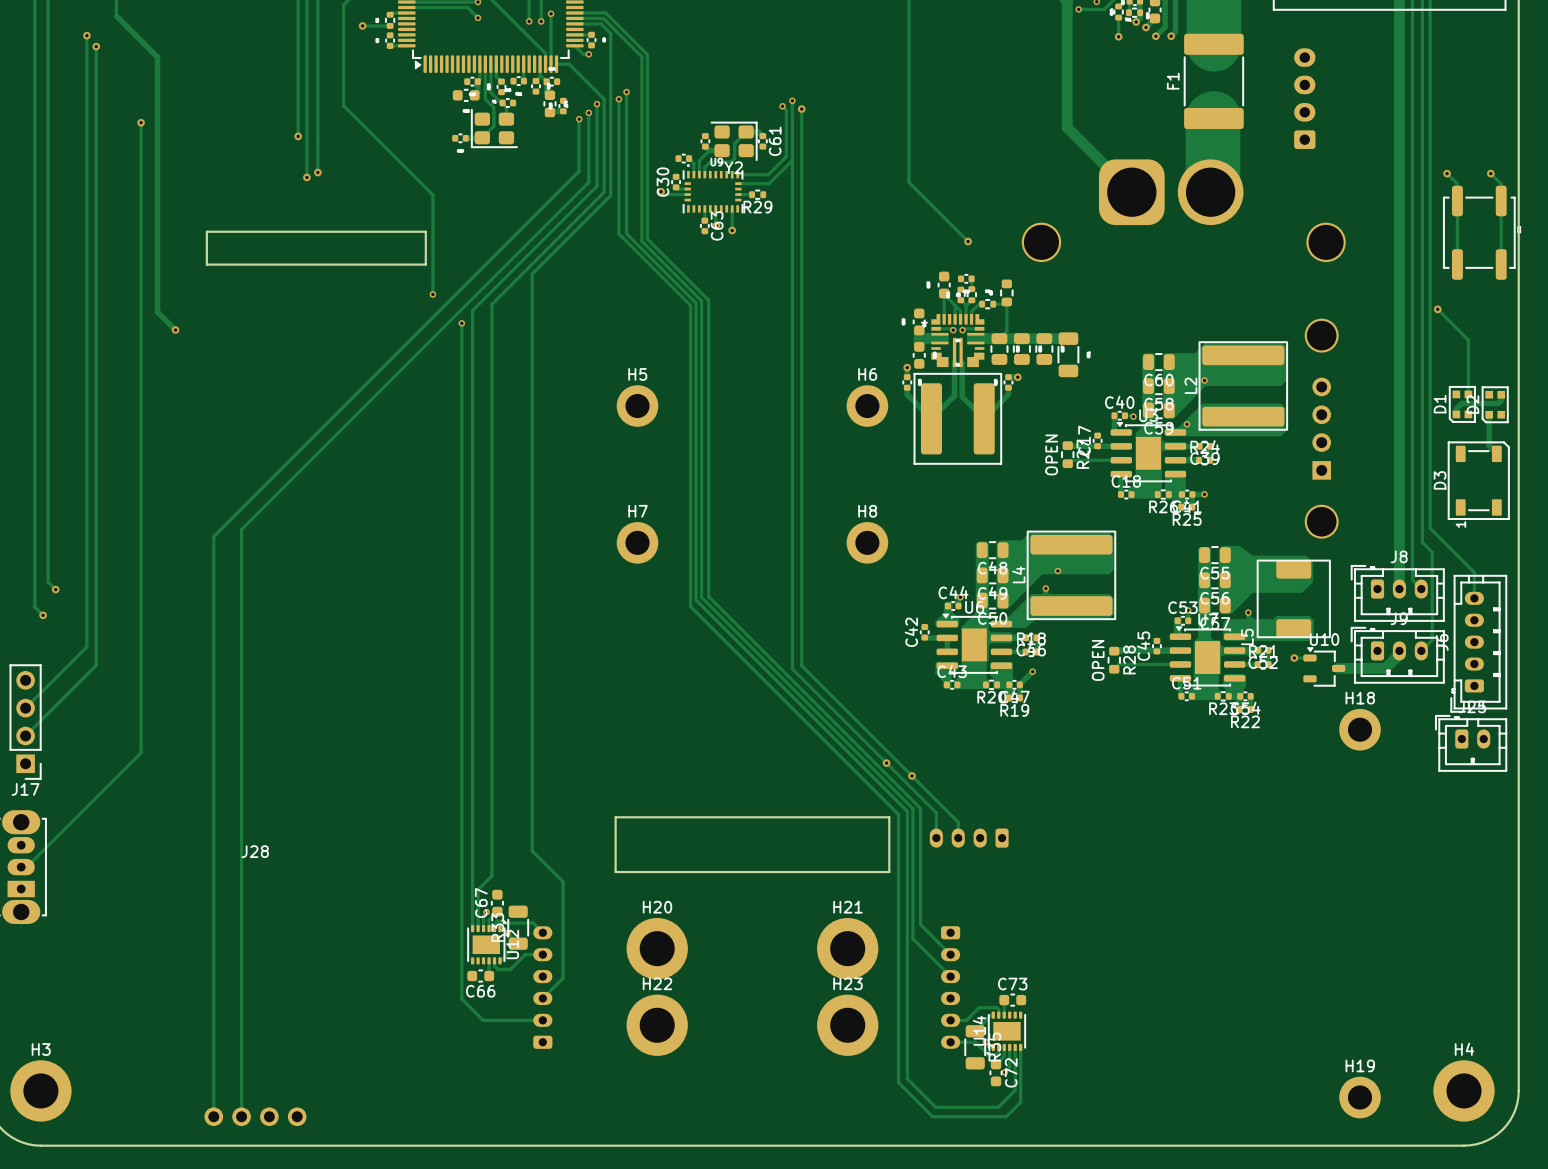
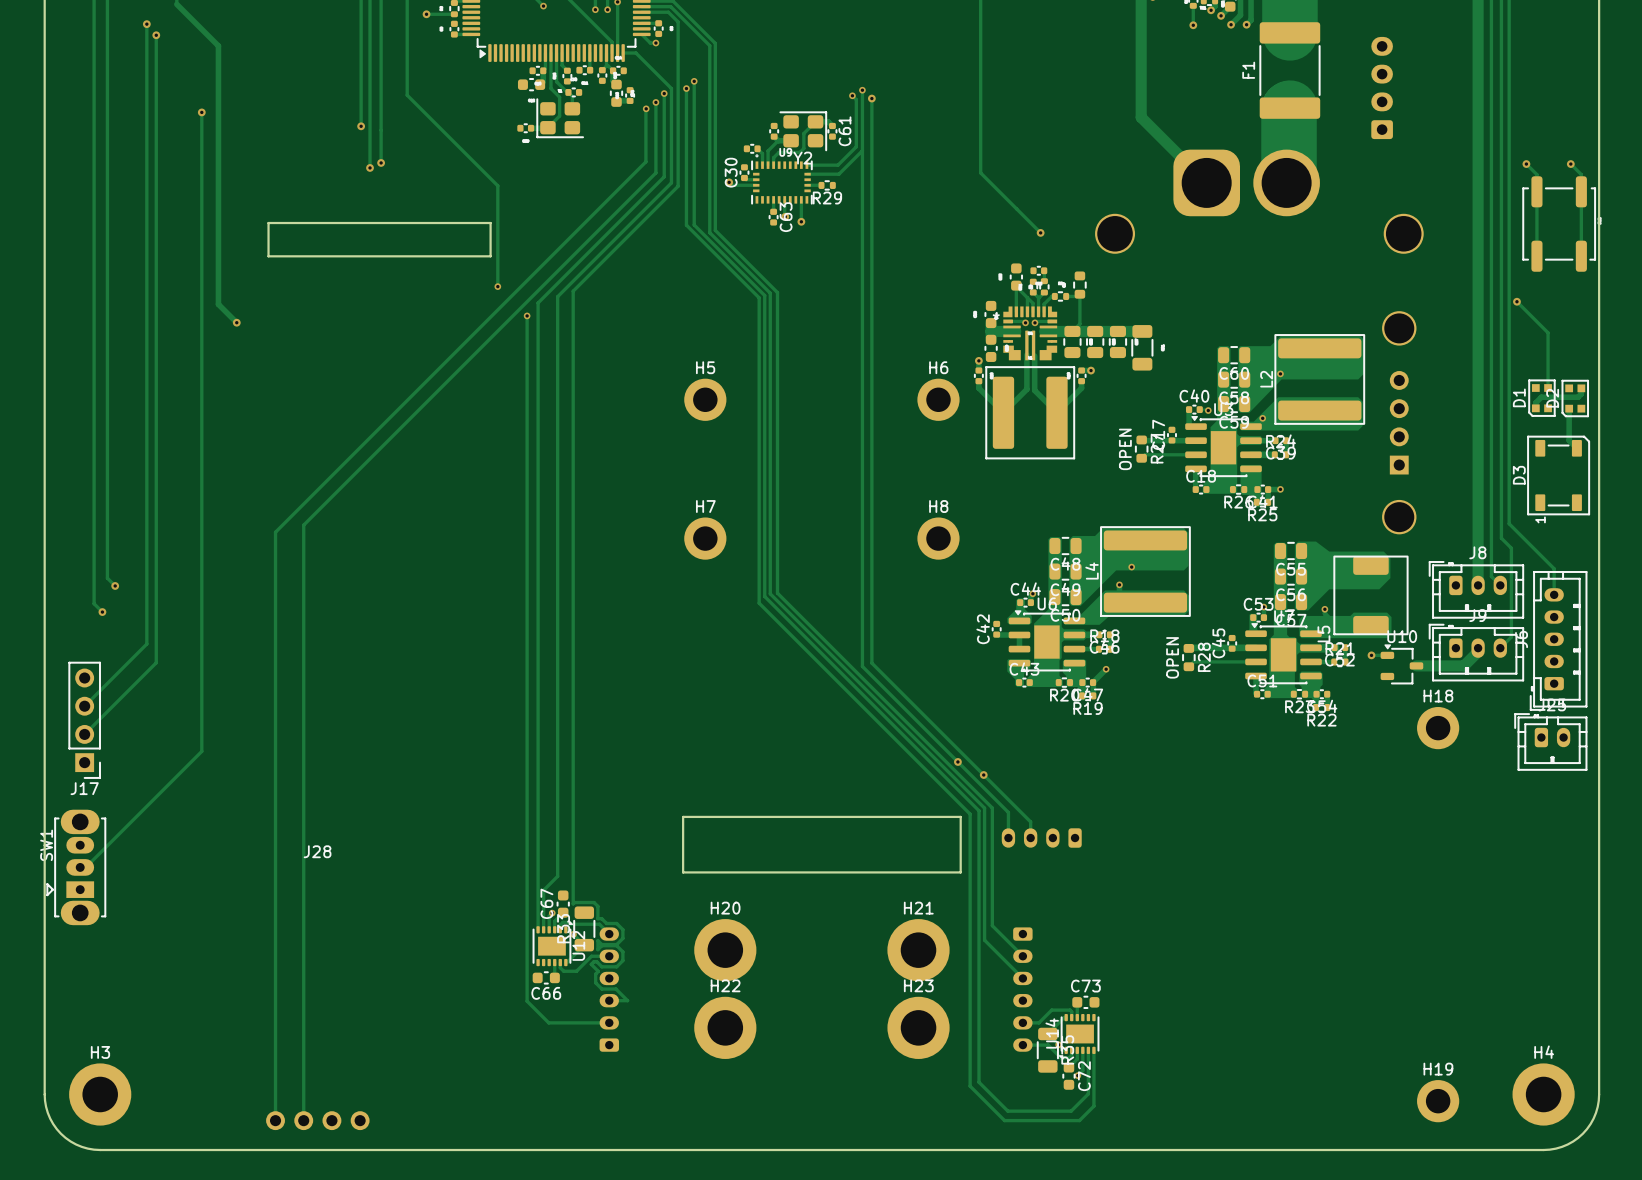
track: (532, 274) (532, 850) (563, 881) (563, 978) (542, 998) -> (598, 265) (573, 291) (573, 903) (594, 902) (597, 906) (597, 918) (601, 918) (606, 923) (616, 923) (622, 929) (622, 938) (616, 944) (601, 944) (597, 940) (597, 949) (601, 945) (616, 945) (622, 951) (622, 960) (616, 966) (601, 966) (596, 961) (591, 964) (598, 971) (595, 974) (595, 982) (601, 989) (615, 989) (627, 1000) (609, 1000)

